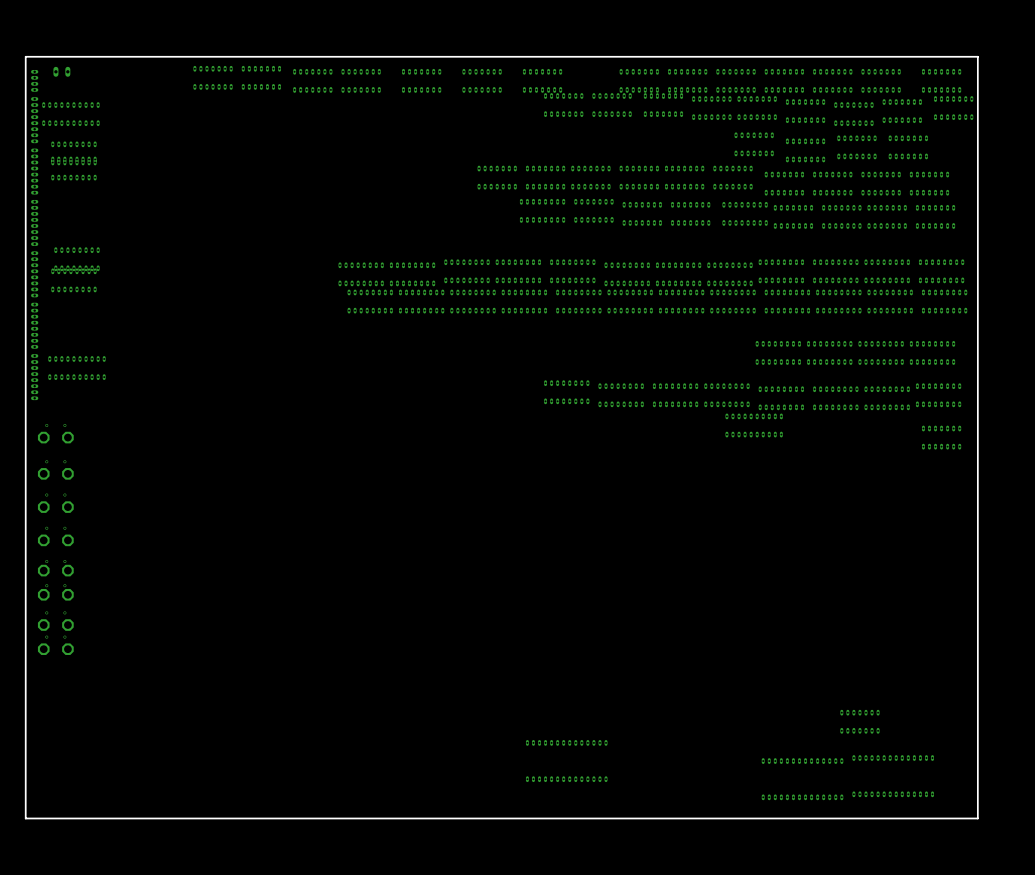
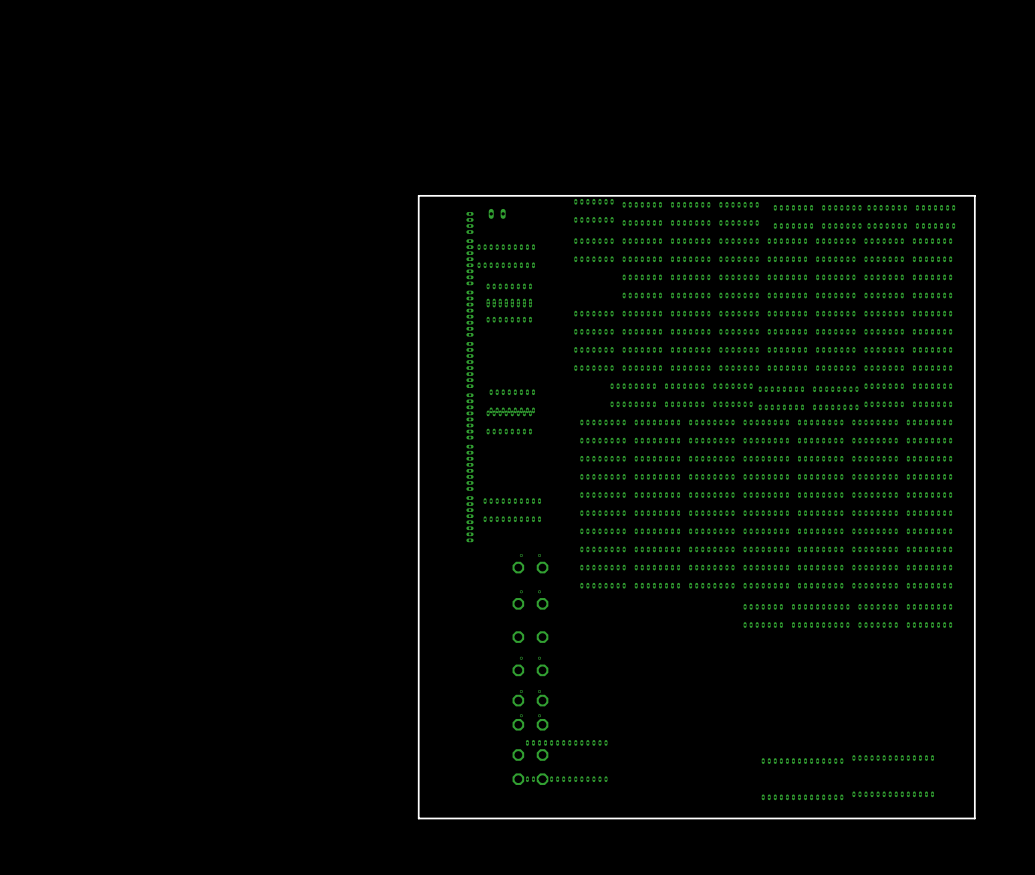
part: (61, 71) -> none
part: (213, 77) -> none
part: (261, 77) -> none
part: (34, 80) -> none
part: (312, 80) -> none
part: (361, 80) -> none
part: (421, 80) -> none
part: (482, 80) -> none
part: (542, 80) -> none
part: (639, 80) -> none
part: (687, 80) -> none
part: (736, 80) -> none
part: (784, 80) -> none
part: (832, 80) -> none
part: (881, 80) -> none
part: (941, 80) -> none
part: (563, 105) -> none
part: (612, 105) -> none
part: (663, 105) -> none
part: (711, 108) -> none
part: (757, 108) -> none
part: (953, 108) -> none
part: (805, 111) -> none
part: (902, 111) -> none
part: (70, 114) -> none
part: (853, 114) -> none
part: (34, 120) -> none
part: (754, 144) -> none
part: (856, 147) -> none
part: (908, 147) -> none
part: (805, 150) -> none
part: (73, 153) -> none
part: (73, 168) -> none
part: (34, 171) -> none
part: (497, 177) -> none
part: (545, 177) -> none
part: (590, 177) -> none
part: (639, 177) -> none
part: (684, 177) -> none
part: (732, 177) -> none
part: (784, 183) -> none
part: (832, 183) -> none
part: (881, 183) -> none
part: (929, 183) -> none
part footprint: [722, 201, 768, 226] -> [719, 201, 759, 226]
part: (542, 210) -> none
part: none -> (497, 213)
part: (34, 222) -> none
part: none -> (469, 222)
part: none -> (593, 250)
part: none -> (642, 250)
part: none -> (690, 250)
part: none -> (739, 250)
part: none -> (787, 250)
part: none -> (835, 250)
part: none -> (884, 250)
part: none -> (932, 250)
part: none -> (506, 256)
part: (76, 259) -> none
part: none -> (469, 262)
part: (466, 271) -> none
part: (518, 271) -> none
part: (572, 271) -> none
part: (781, 271) -> none
part: (835, 271) -> none
part: (887, 271) -> none
part: (941, 271) -> none
part: (34, 274) -> none
part: (361, 274) -> none
part: (412, 274) -> none
part: (627, 274) -> none
part: (678, 274) -> none
part: (729, 274) -> none
part: (73, 280) -> none
part: none -> (642, 286)
part: none -> (690, 286)
part: none -> (739, 286)
part: none -> (787, 286)
part: none -> (835, 286)
part: none -> (884, 286)
part: none -> (932, 286)
part: none -> (509, 295)
part: (370, 301) -> none
part: (421, 301) -> none
part: (473, 301) -> none
part: (524, 301) -> none
part: (578, 301) -> none
part: (630, 301) -> none
part: (681, 301) -> none
part: (732, 301) -> none
part: (787, 301) -> none
part: (838, 301) -> none
part: (890, 301) -> none
part: (944, 301) -> none
part: none -> (509, 310)
part: none -> (469, 313)
part: none -> (593, 322)
part: none -> (642, 322)
part: none -> (690, 322)
part: none -> (739, 322)
part: none -> (787, 322)
part: none -> (835, 322)
part: none -> (884, 322)
part: none -> (932, 322)
part: (34, 325) -> none
part footprint: [807, 340, 853, 365] -> [816, 347, 856, 371]
part footprint: [858, 340, 904, 365] -> [864, 347, 904, 371]
part footprint: [909, 340, 956, 365] -> [912, 347, 953, 371]
part: (778, 352) -> none
part: none -> (593, 358)
part: none -> (642, 358)
part: none -> (690, 358)
part: none -> (739, 358)
part: none -> (787, 358)
part: none -> (469, 365)
part: (76, 368) -> none
part: (34, 377) -> none
part footprint: [652, 383, 699, 408] -> [665, 383, 705, 408]
part footprint: [704, 383, 750, 408] -> [713, 383, 753, 408]
part footprint: [915, 383, 962, 408] -> [912, 383, 953, 408]
part footprint: [864, 386, 910, 411] -> [864, 383, 904, 408]
part: (566, 392) -> none
part position: (621, 395) -> (633, 395)
part: none -> (512, 401)
part: none -> (469, 416)
part: none -> (509, 422)
part: (55, 425) -> none
part: (754, 425) -> none
part: none -> (603, 431)
part: none -> (657, 431)
part: none -> (711, 431)
part: none -> (766, 431)
part: none -> (820, 431)
part: none -> (875, 431)
part: none -> (929, 431)
part: (55, 437) -> none
part: (941, 437) -> none
part: (55, 461) -> none
part: none -> (469, 467)
part: none -> (603, 467)
part: none -> (657, 467)
part: none -> (711, 467)
part: none -> (766, 467)
part: none -> (820, 467)
part: none -> (875, 467)
part: none -> (929, 467)
part: (55, 473) -> none
part: (55, 495) -> none
part: none -> (603, 504)
part: none -> (657, 504)
part: none -> (711, 504)
part: none -> (766, 504)
part: none -> (820, 504)
part: none -> (875, 504)
part: none -> (929, 504)
part: (55, 507) -> none
part: none -> (512, 510)
part: none -> (469, 519)
part: (55, 528) -> none
part: (55, 540) -> none
part: none -> (603, 540)
part: none -> (657, 540)
part: none -> (711, 540)
part: none -> (766, 540)
part: none -> (820, 540)
part: none -> (875, 540)
part: none -> (929, 540)
part: none -> (530, 555)
part: (55, 561) -> none
part: none -> (530, 567)
part: (55, 570) -> none
part: none -> (603, 576)
part: none -> (657, 576)
part: none -> (711, 576)
part: none -> (766, 576)
part: none -> (820, 576)
part: none -> (875, 576)
part: none -> (929, 576)
part: (55, 585) -> none
part: none -> (530, 591)
part: (55, 594) -> none
part: none -> (530, 603)
part: (55, 612) -> none
part: none -> (763, 615)
part: none -> (820, 615)
part: none -> (878, 615)
part: none -> (929, 615)
part: (55, 625) -> none
part: (55, 637) -> none
part: none -> (530, 637)
part: (55, 649) -> none
part: none -> (530, 658)
part: none -> (530, 670)
part: none -> (530, 691)
part: none -> (530, 700)
part: none -> (530, 715)
part: (859, 721) -> none
part: none -> (530, 724)
part: none -> (530, 755)
part: none -> (530, 779)
board edge: (974, 818) (977, 818) (977, 56) (25, 56) (25, 818) (418, 818) -> (974, 818) (974, 195) (418, 195) (418, 818)

